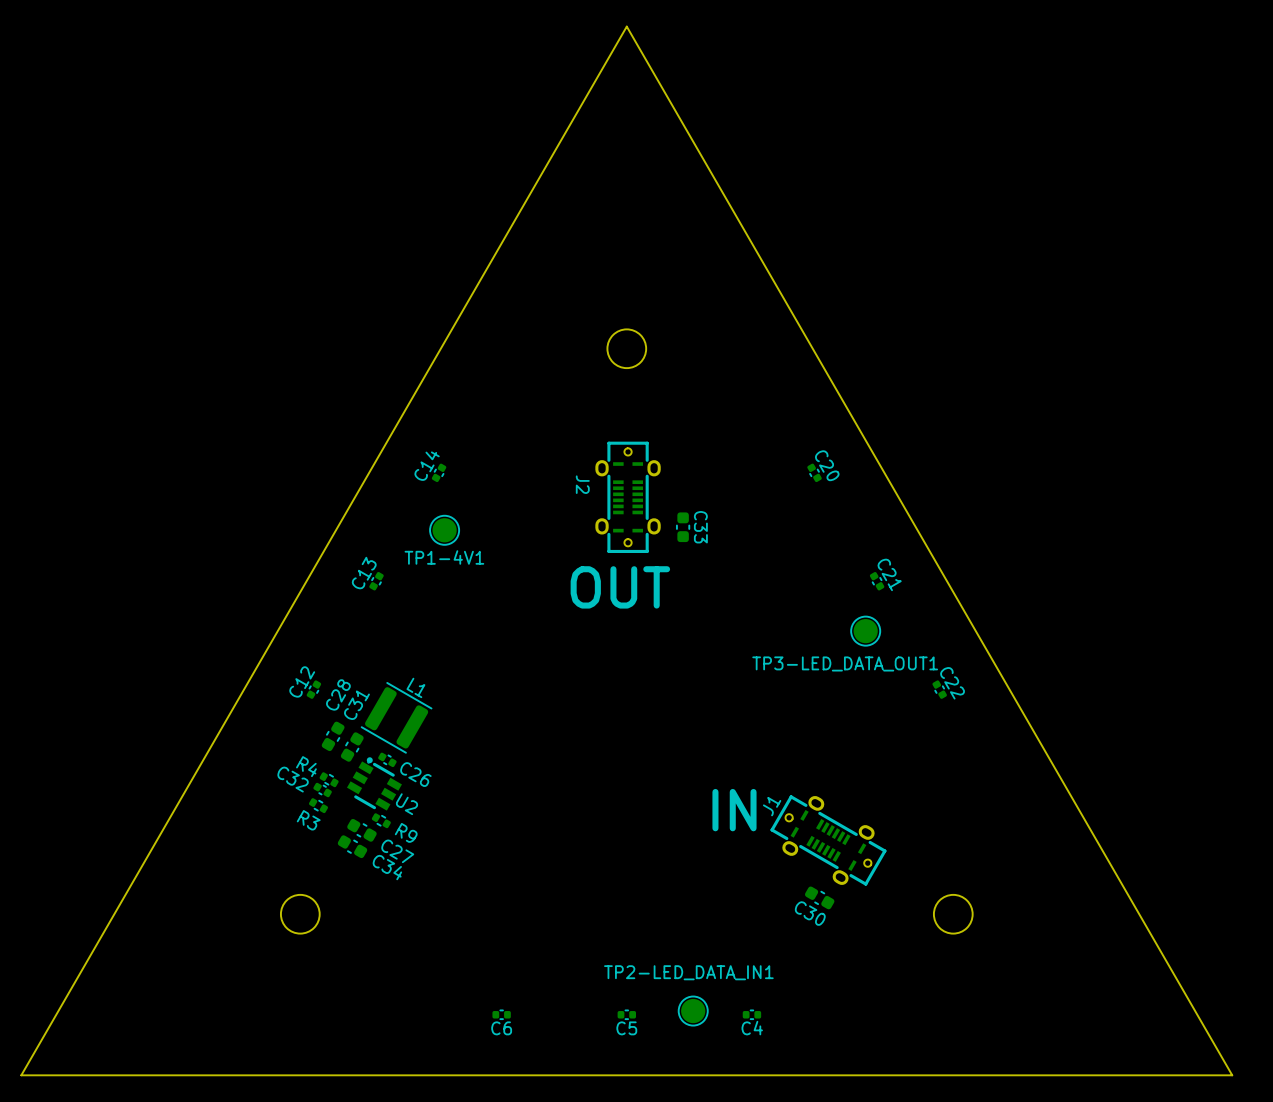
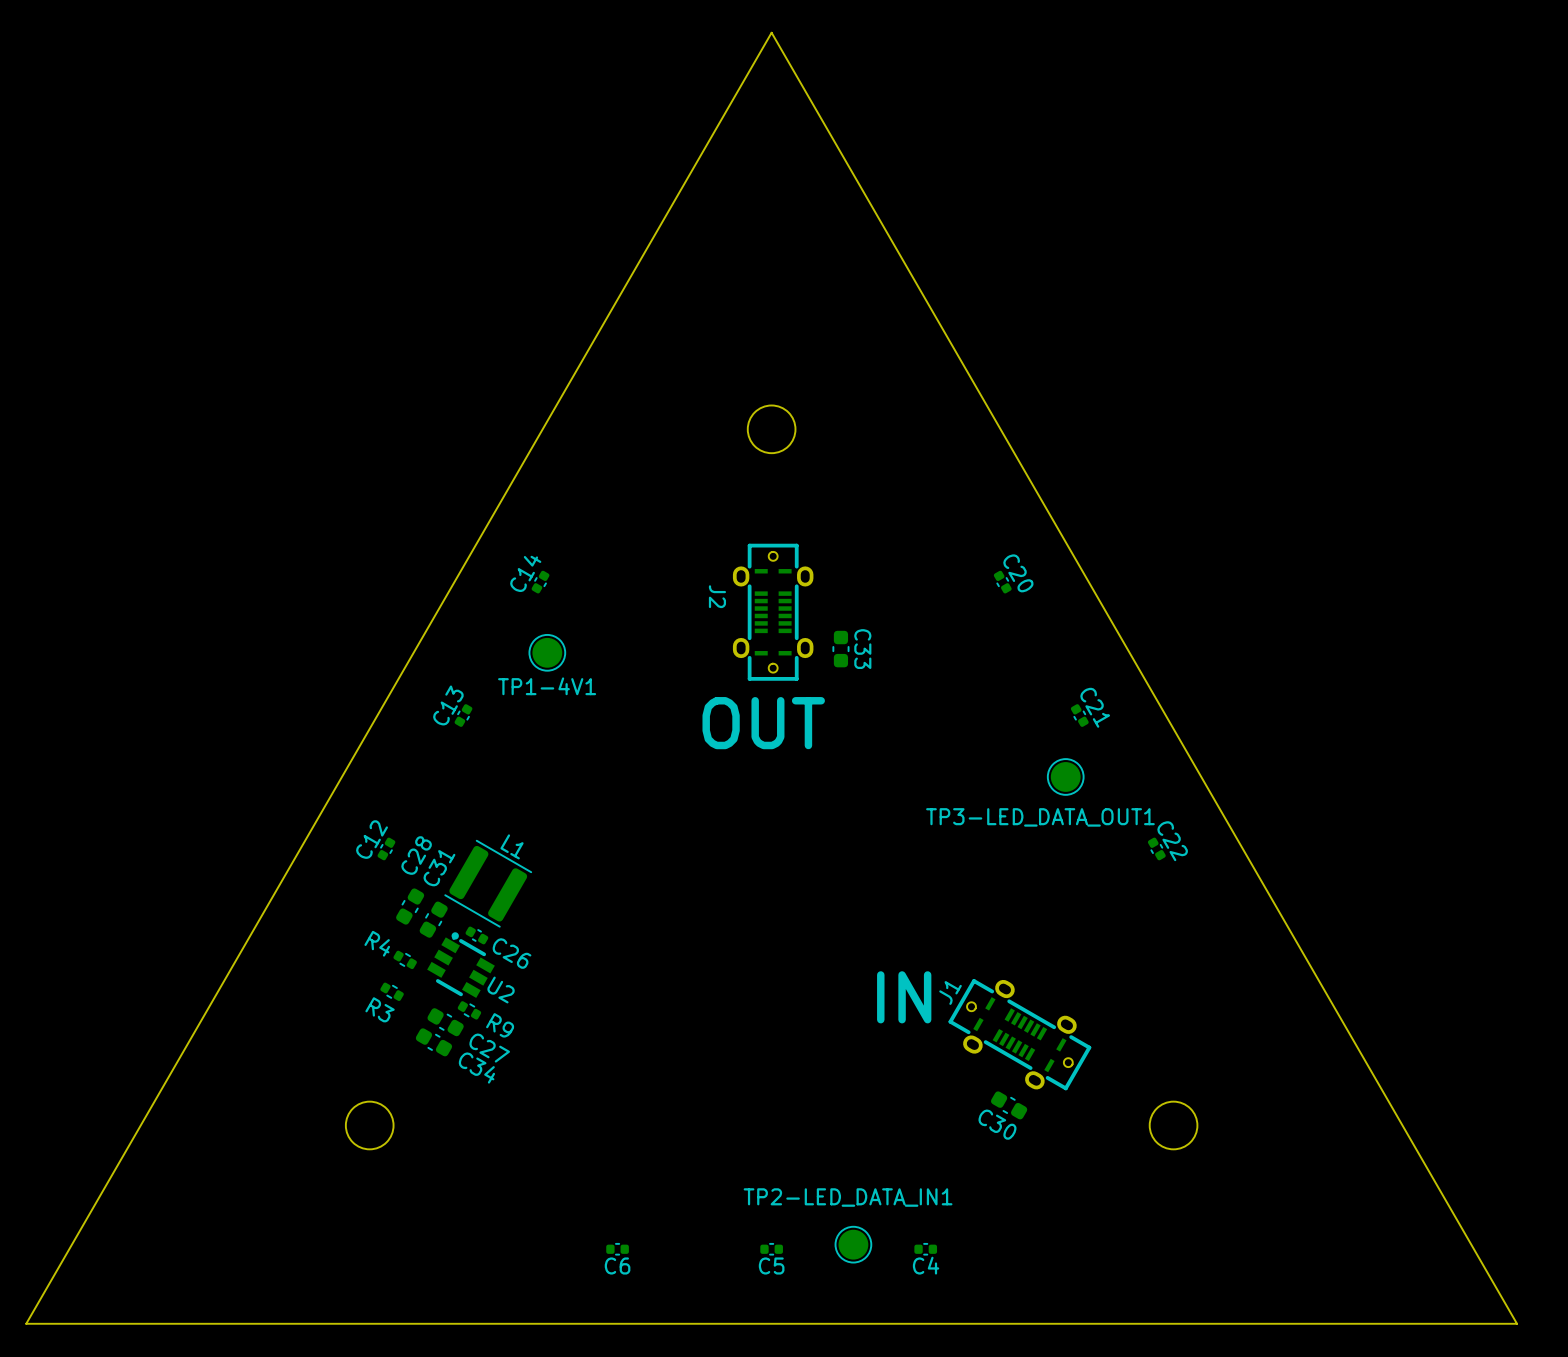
C32: (322, 790) -> none

